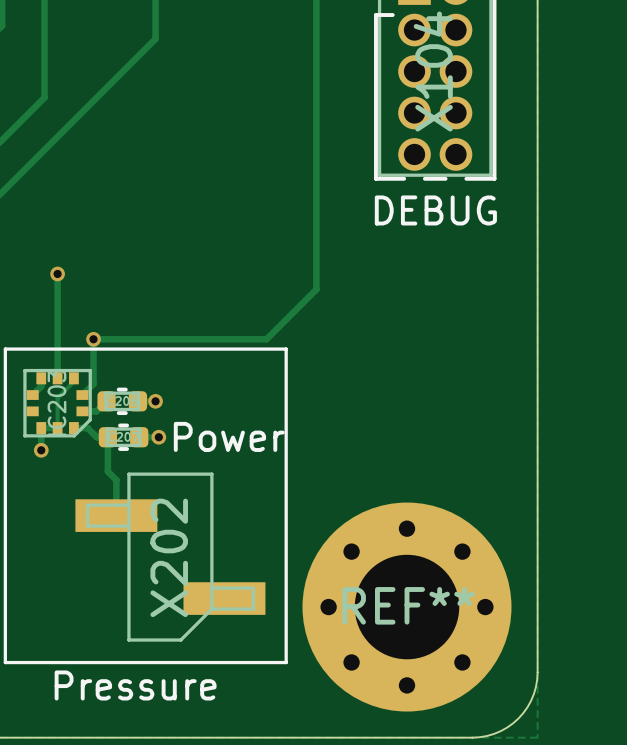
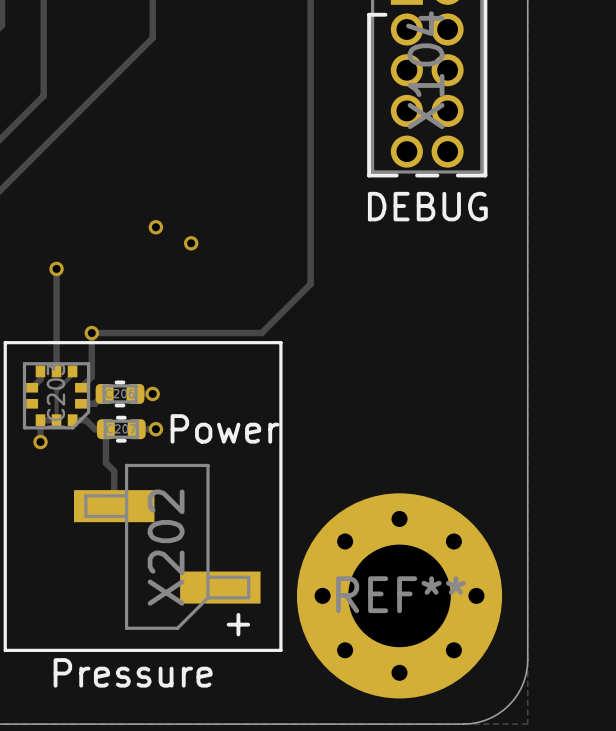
via: none -> (155, 227)
via: none -> (191, 243)
text: none -> + (238, 624)

